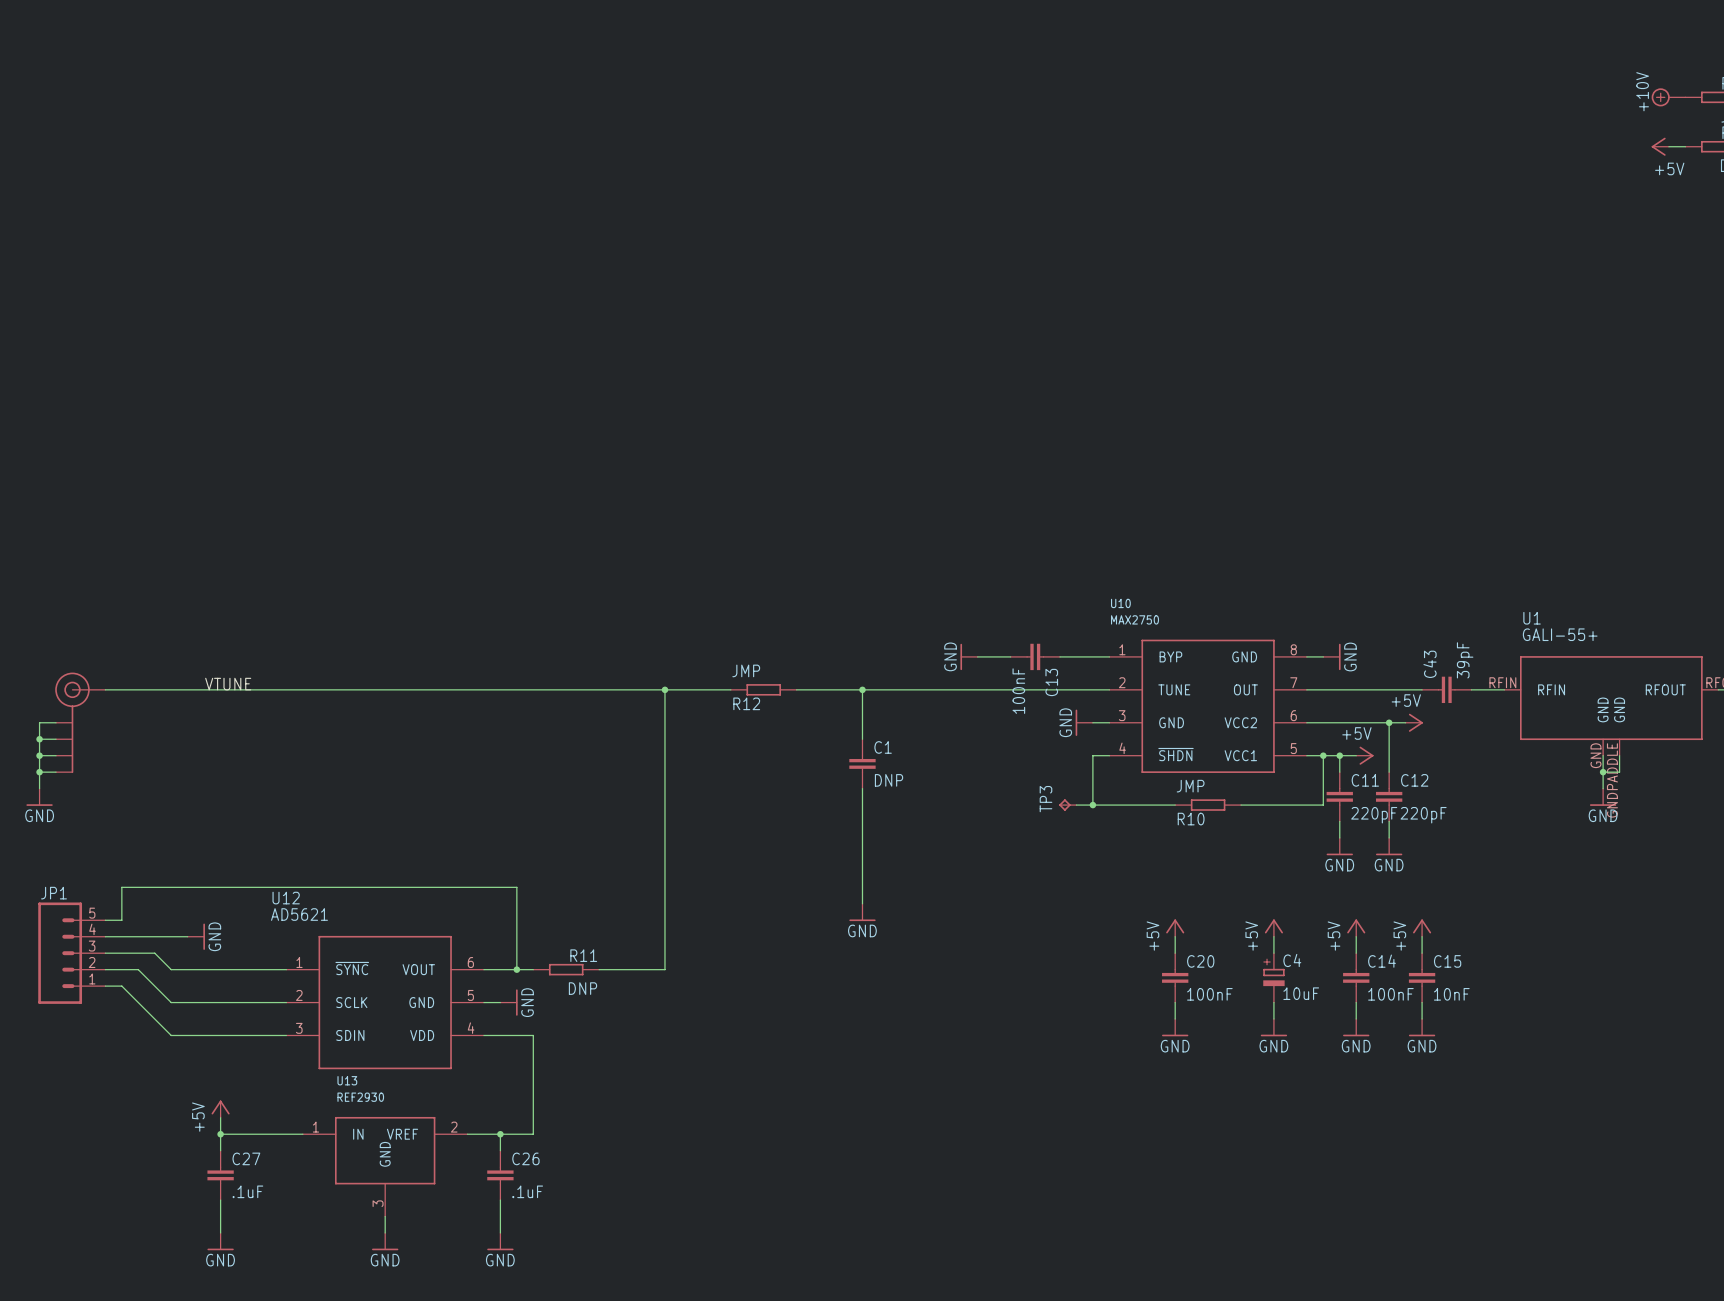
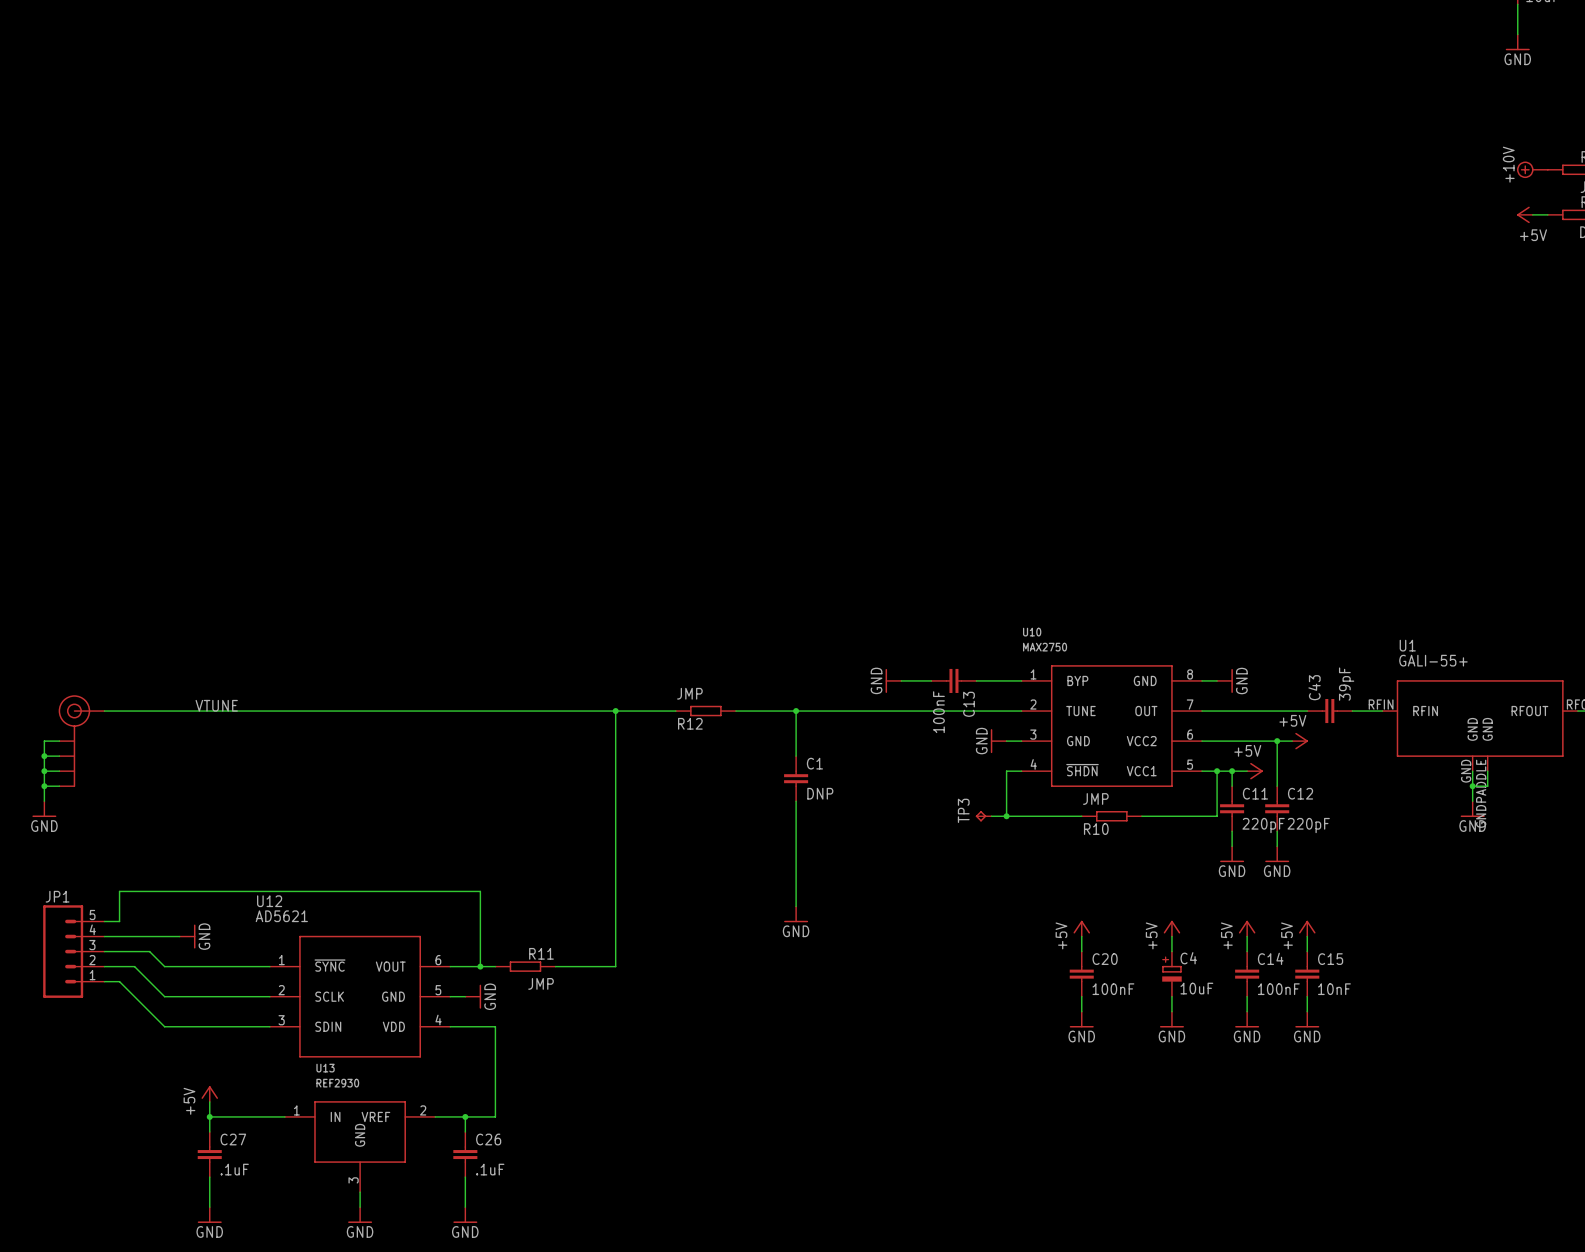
R11 value: DNP (582, 988) -> JMP (541, 983)

